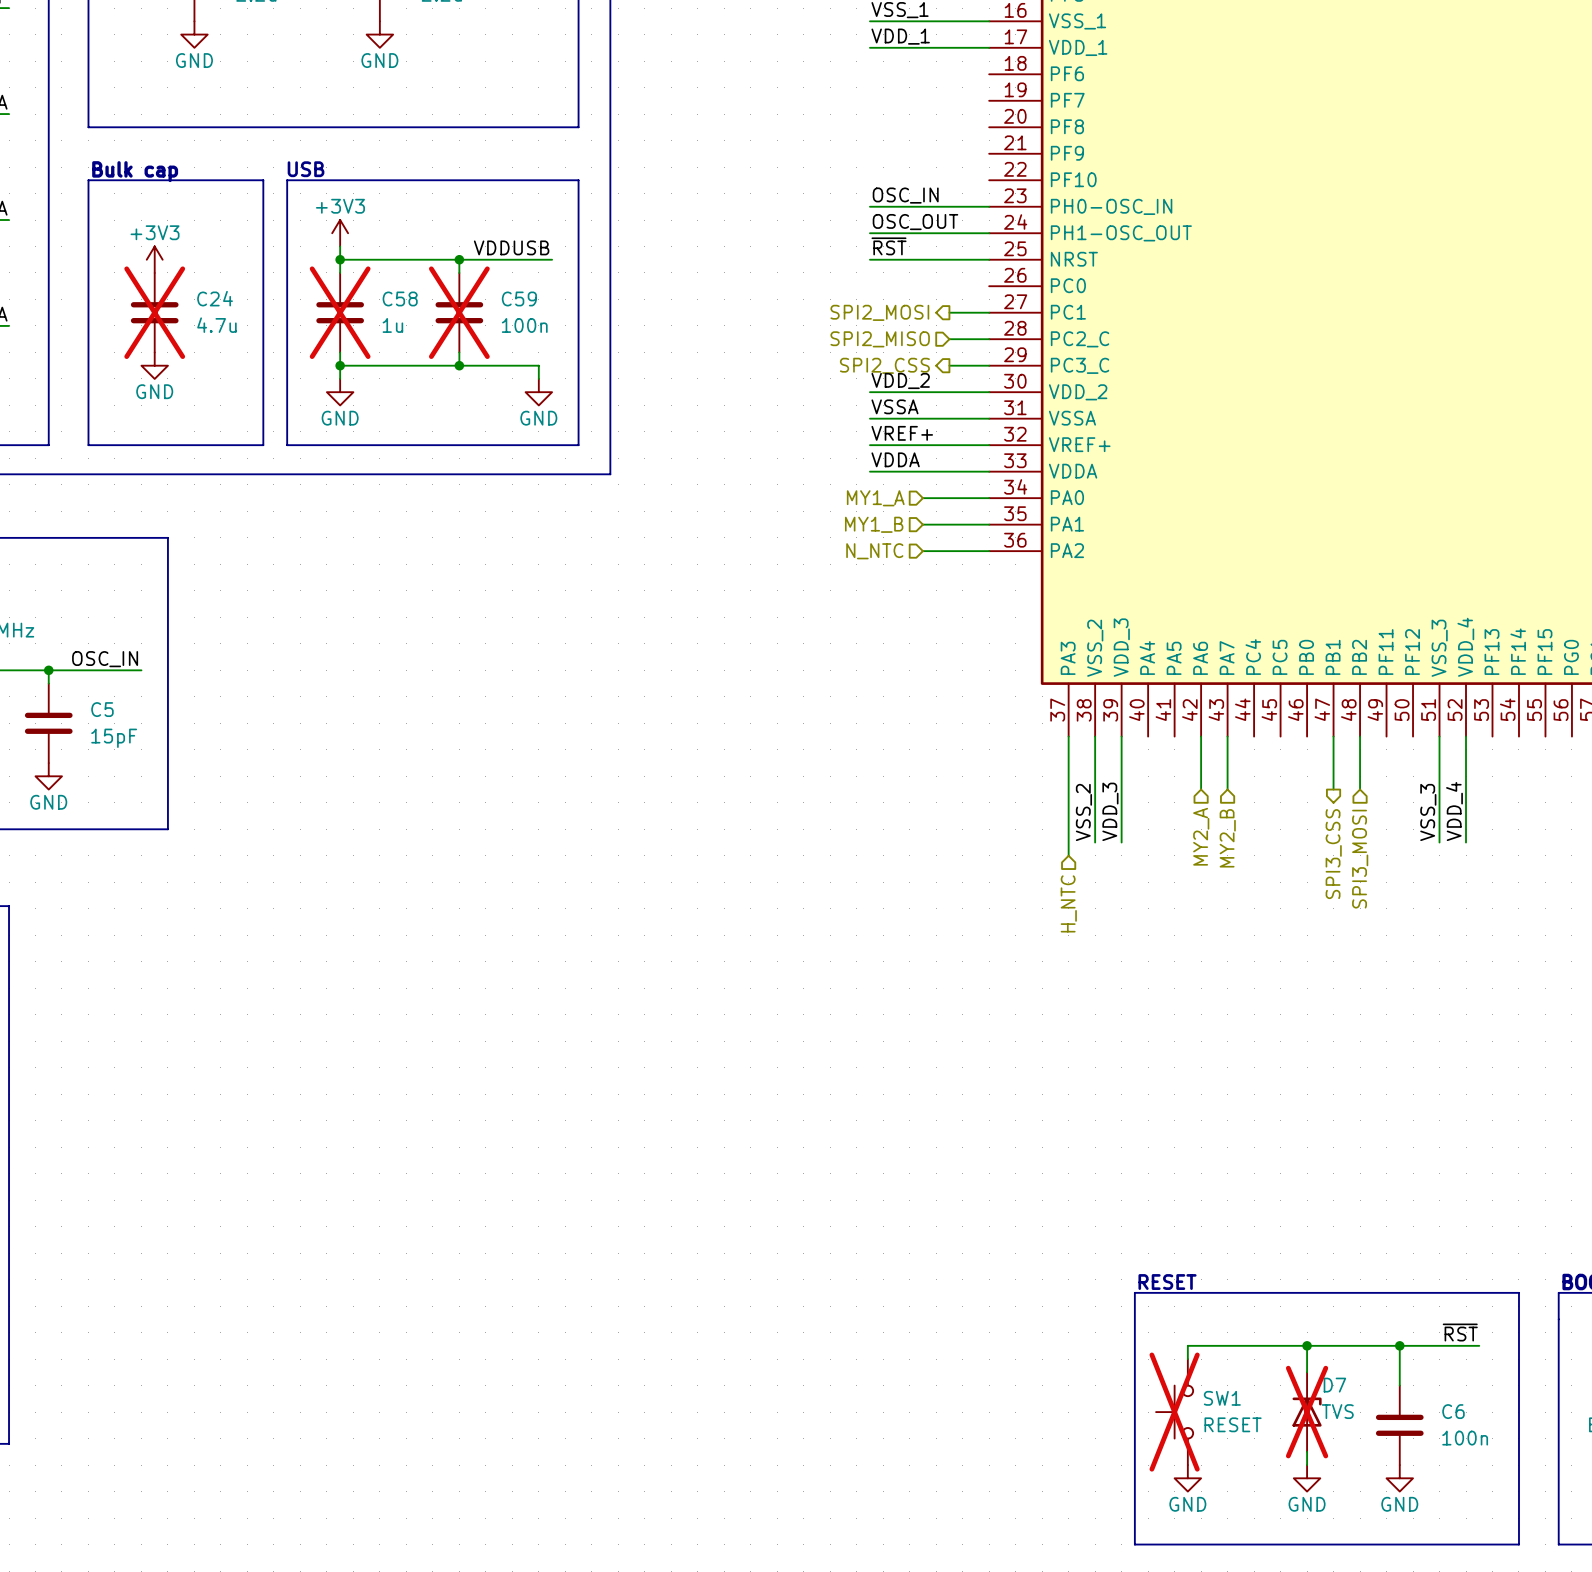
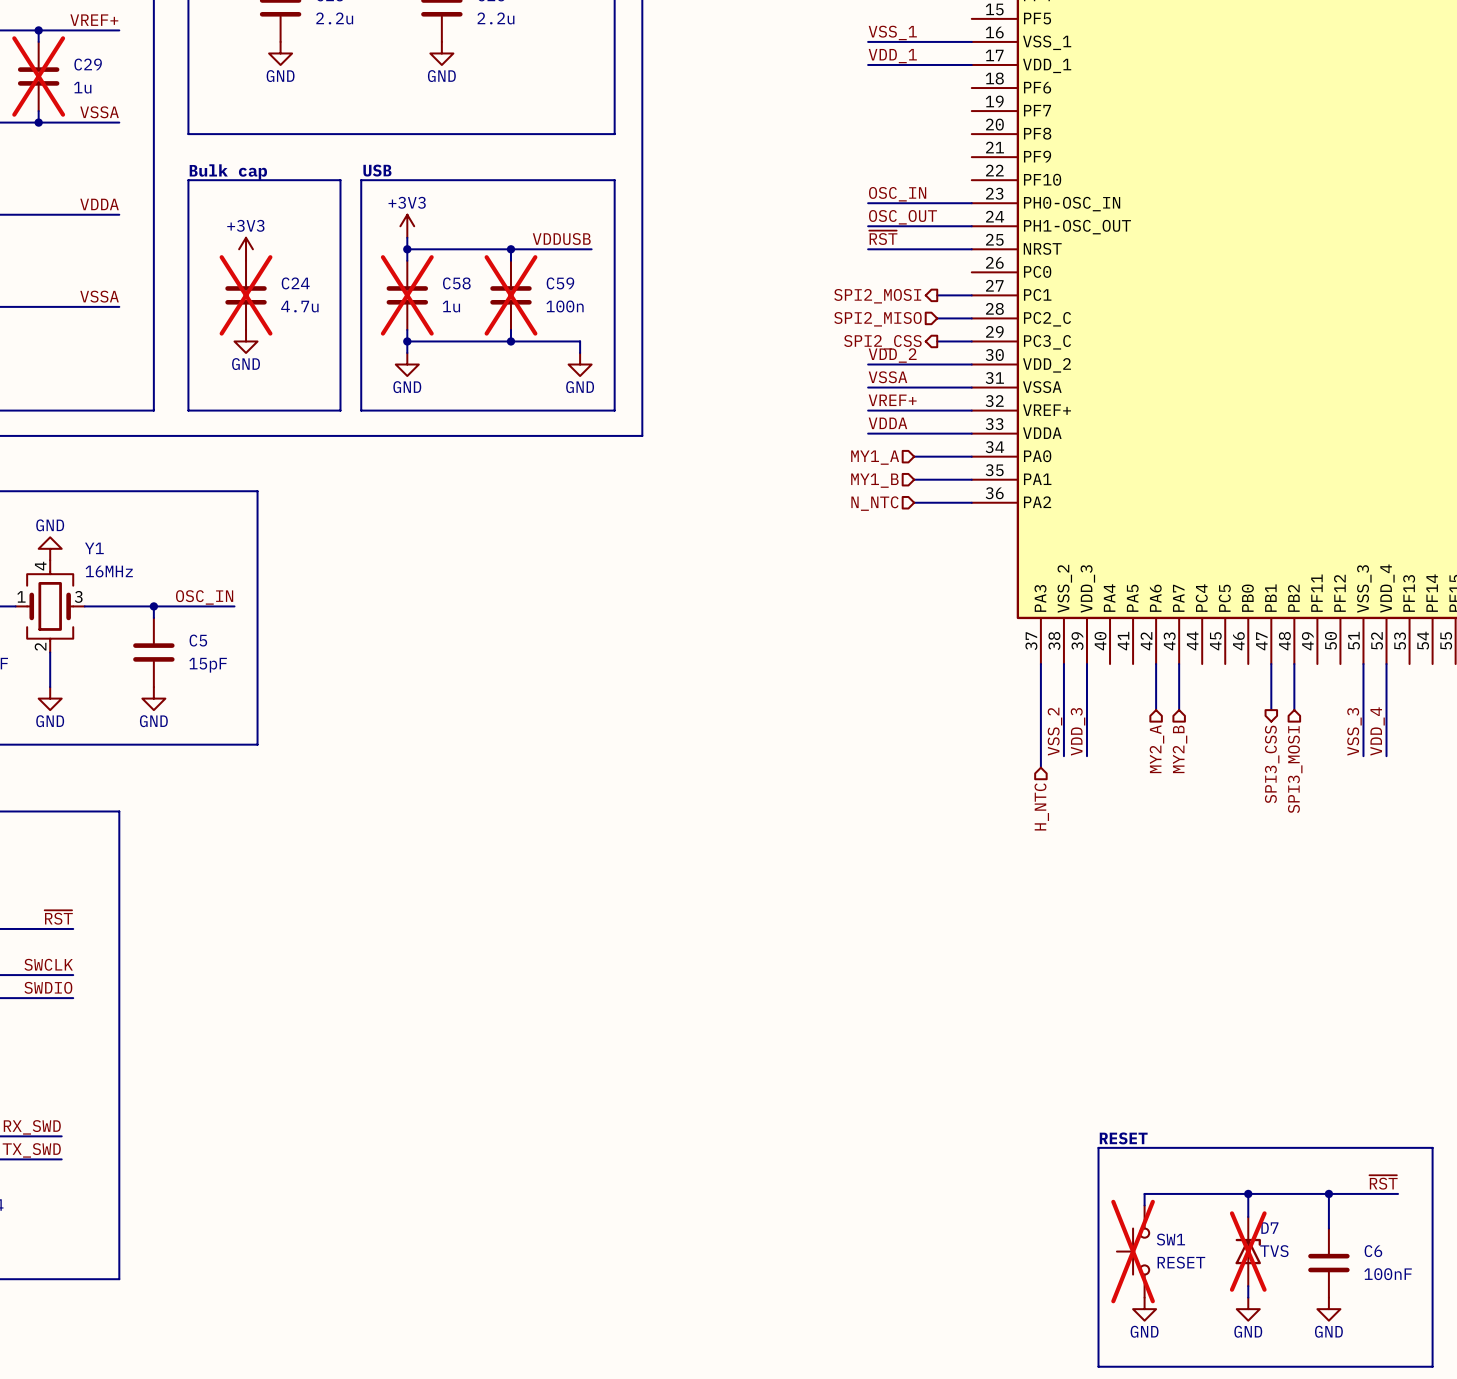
C6 value: 100n (1465, 1438) -> 100nF (1388, 1274)

